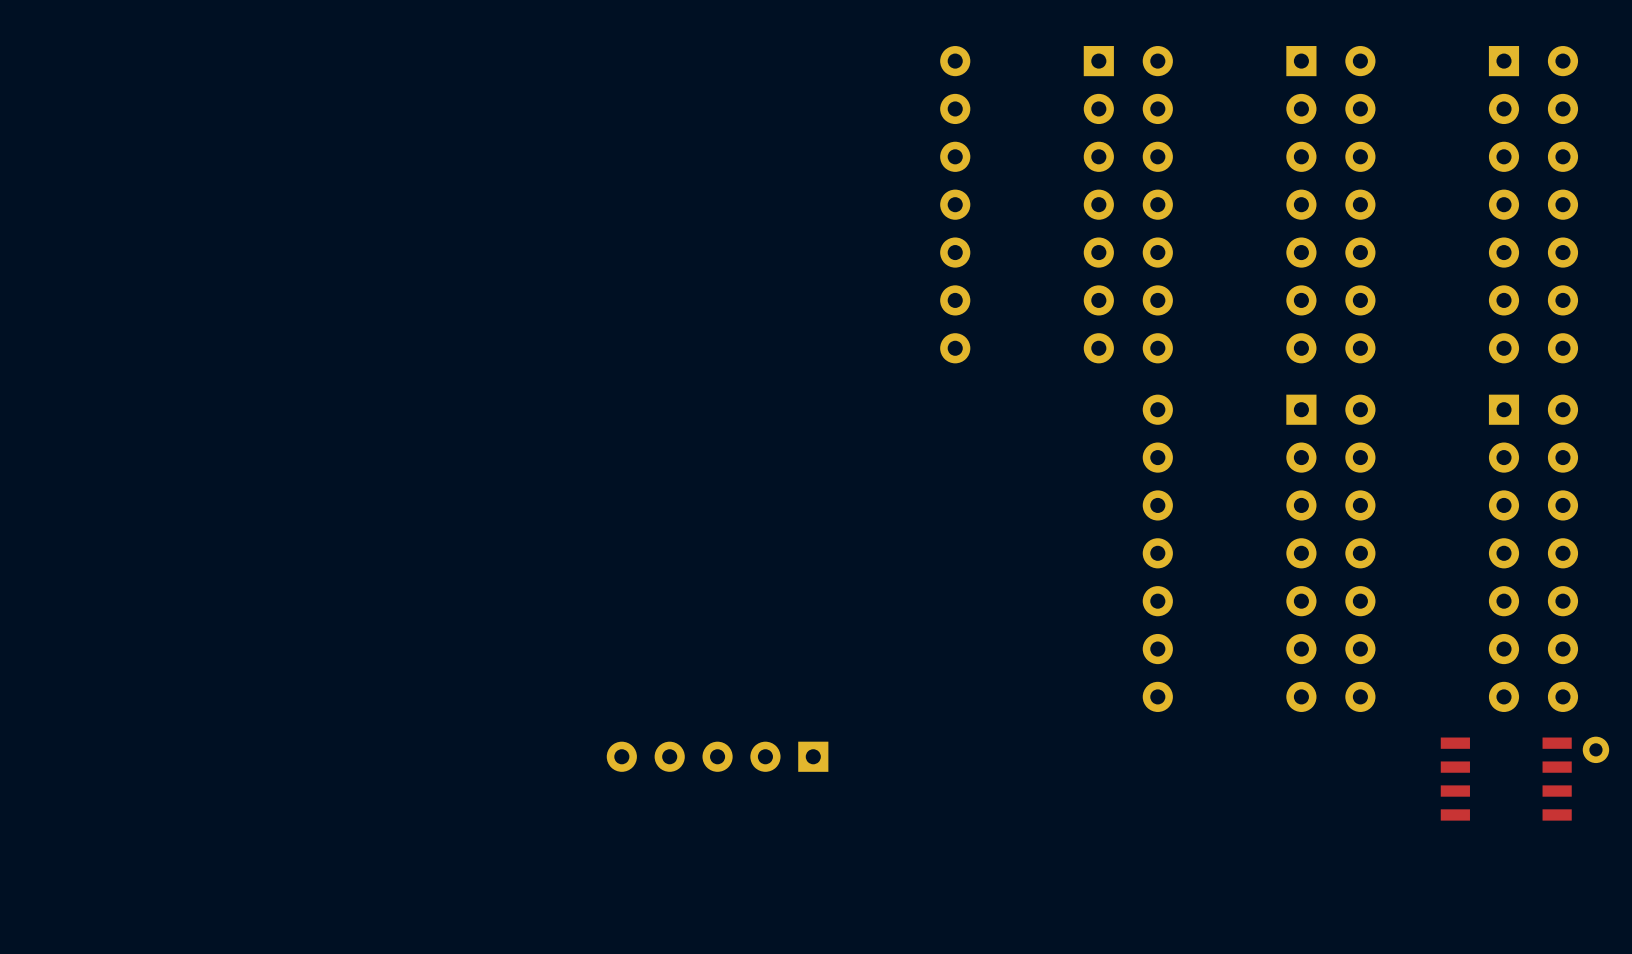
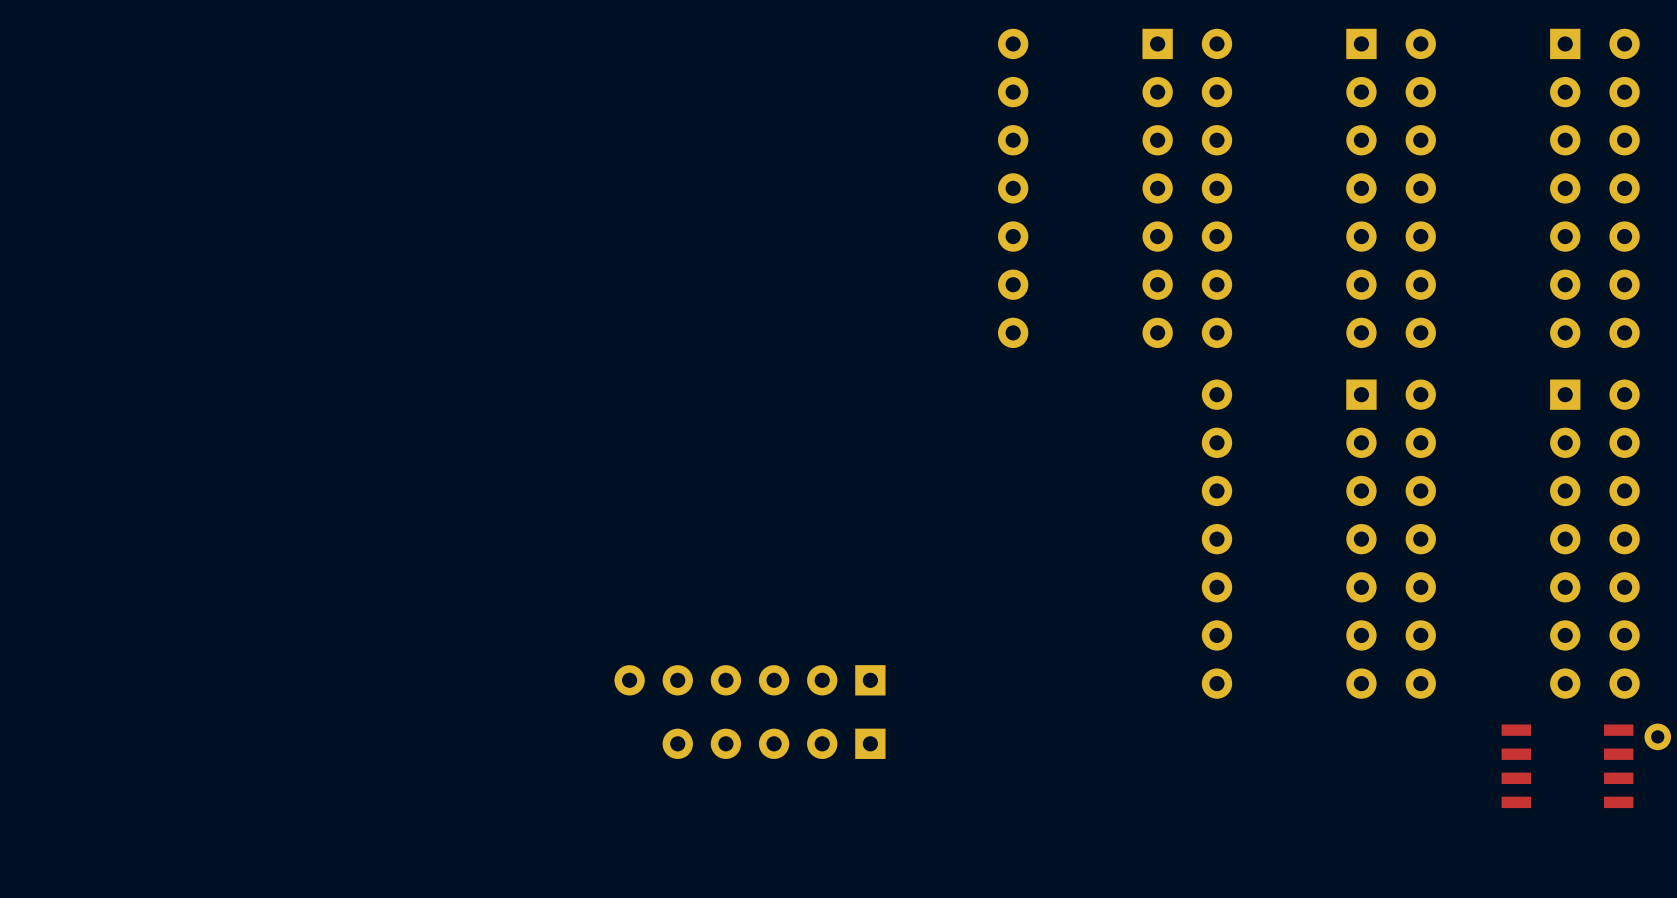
part: none -> (749, 680)

